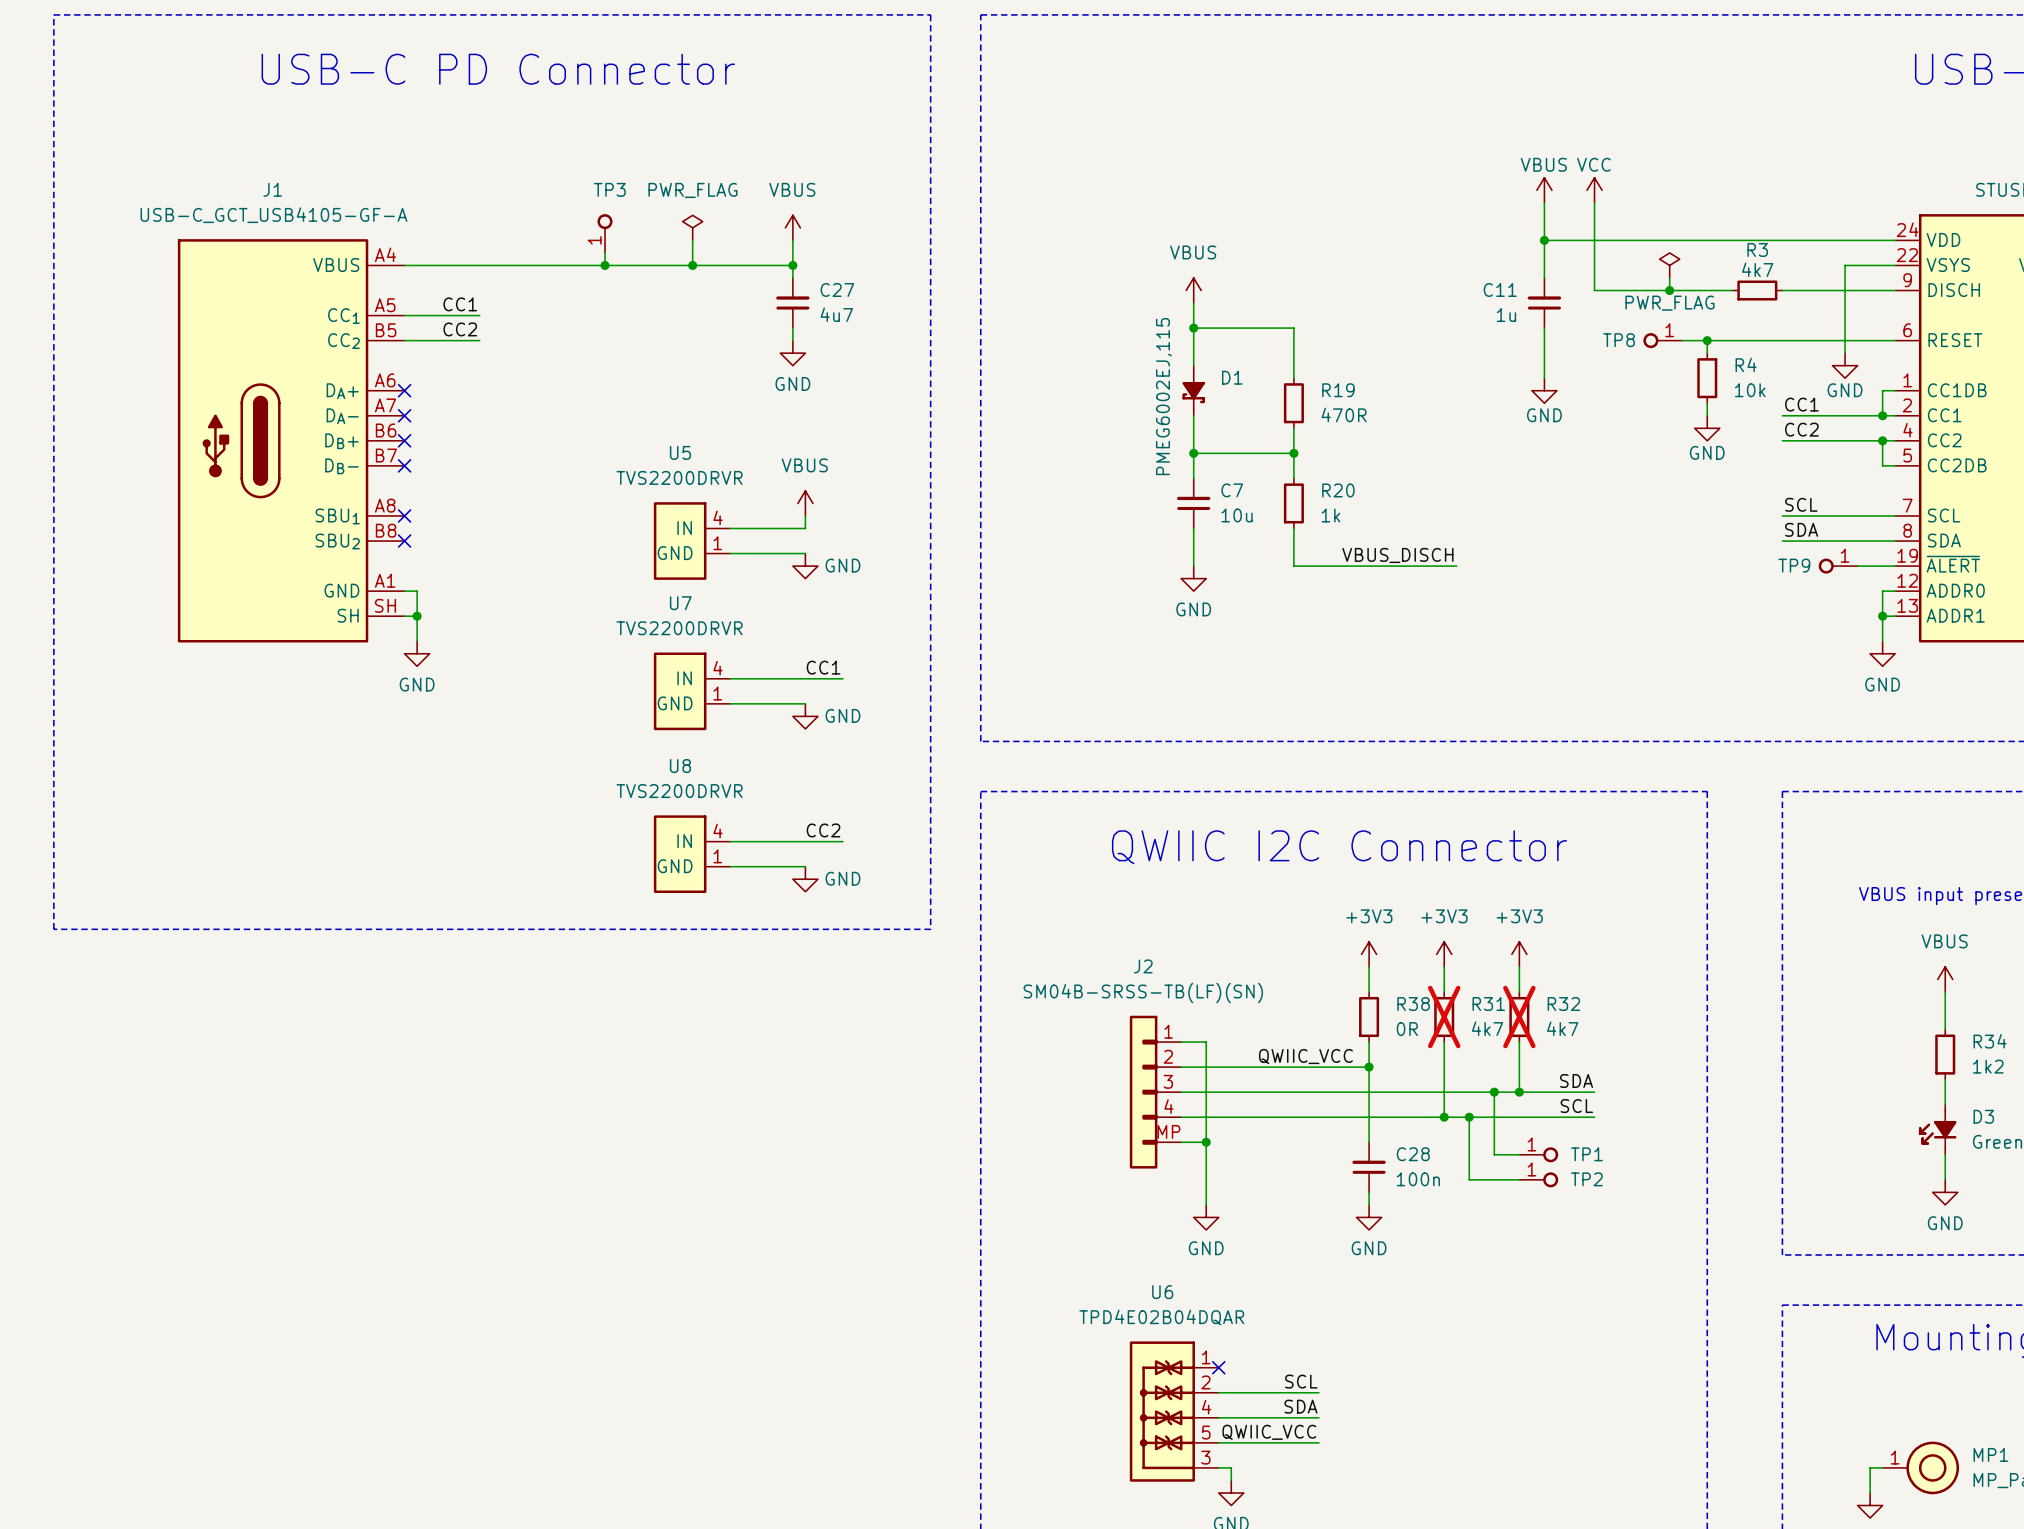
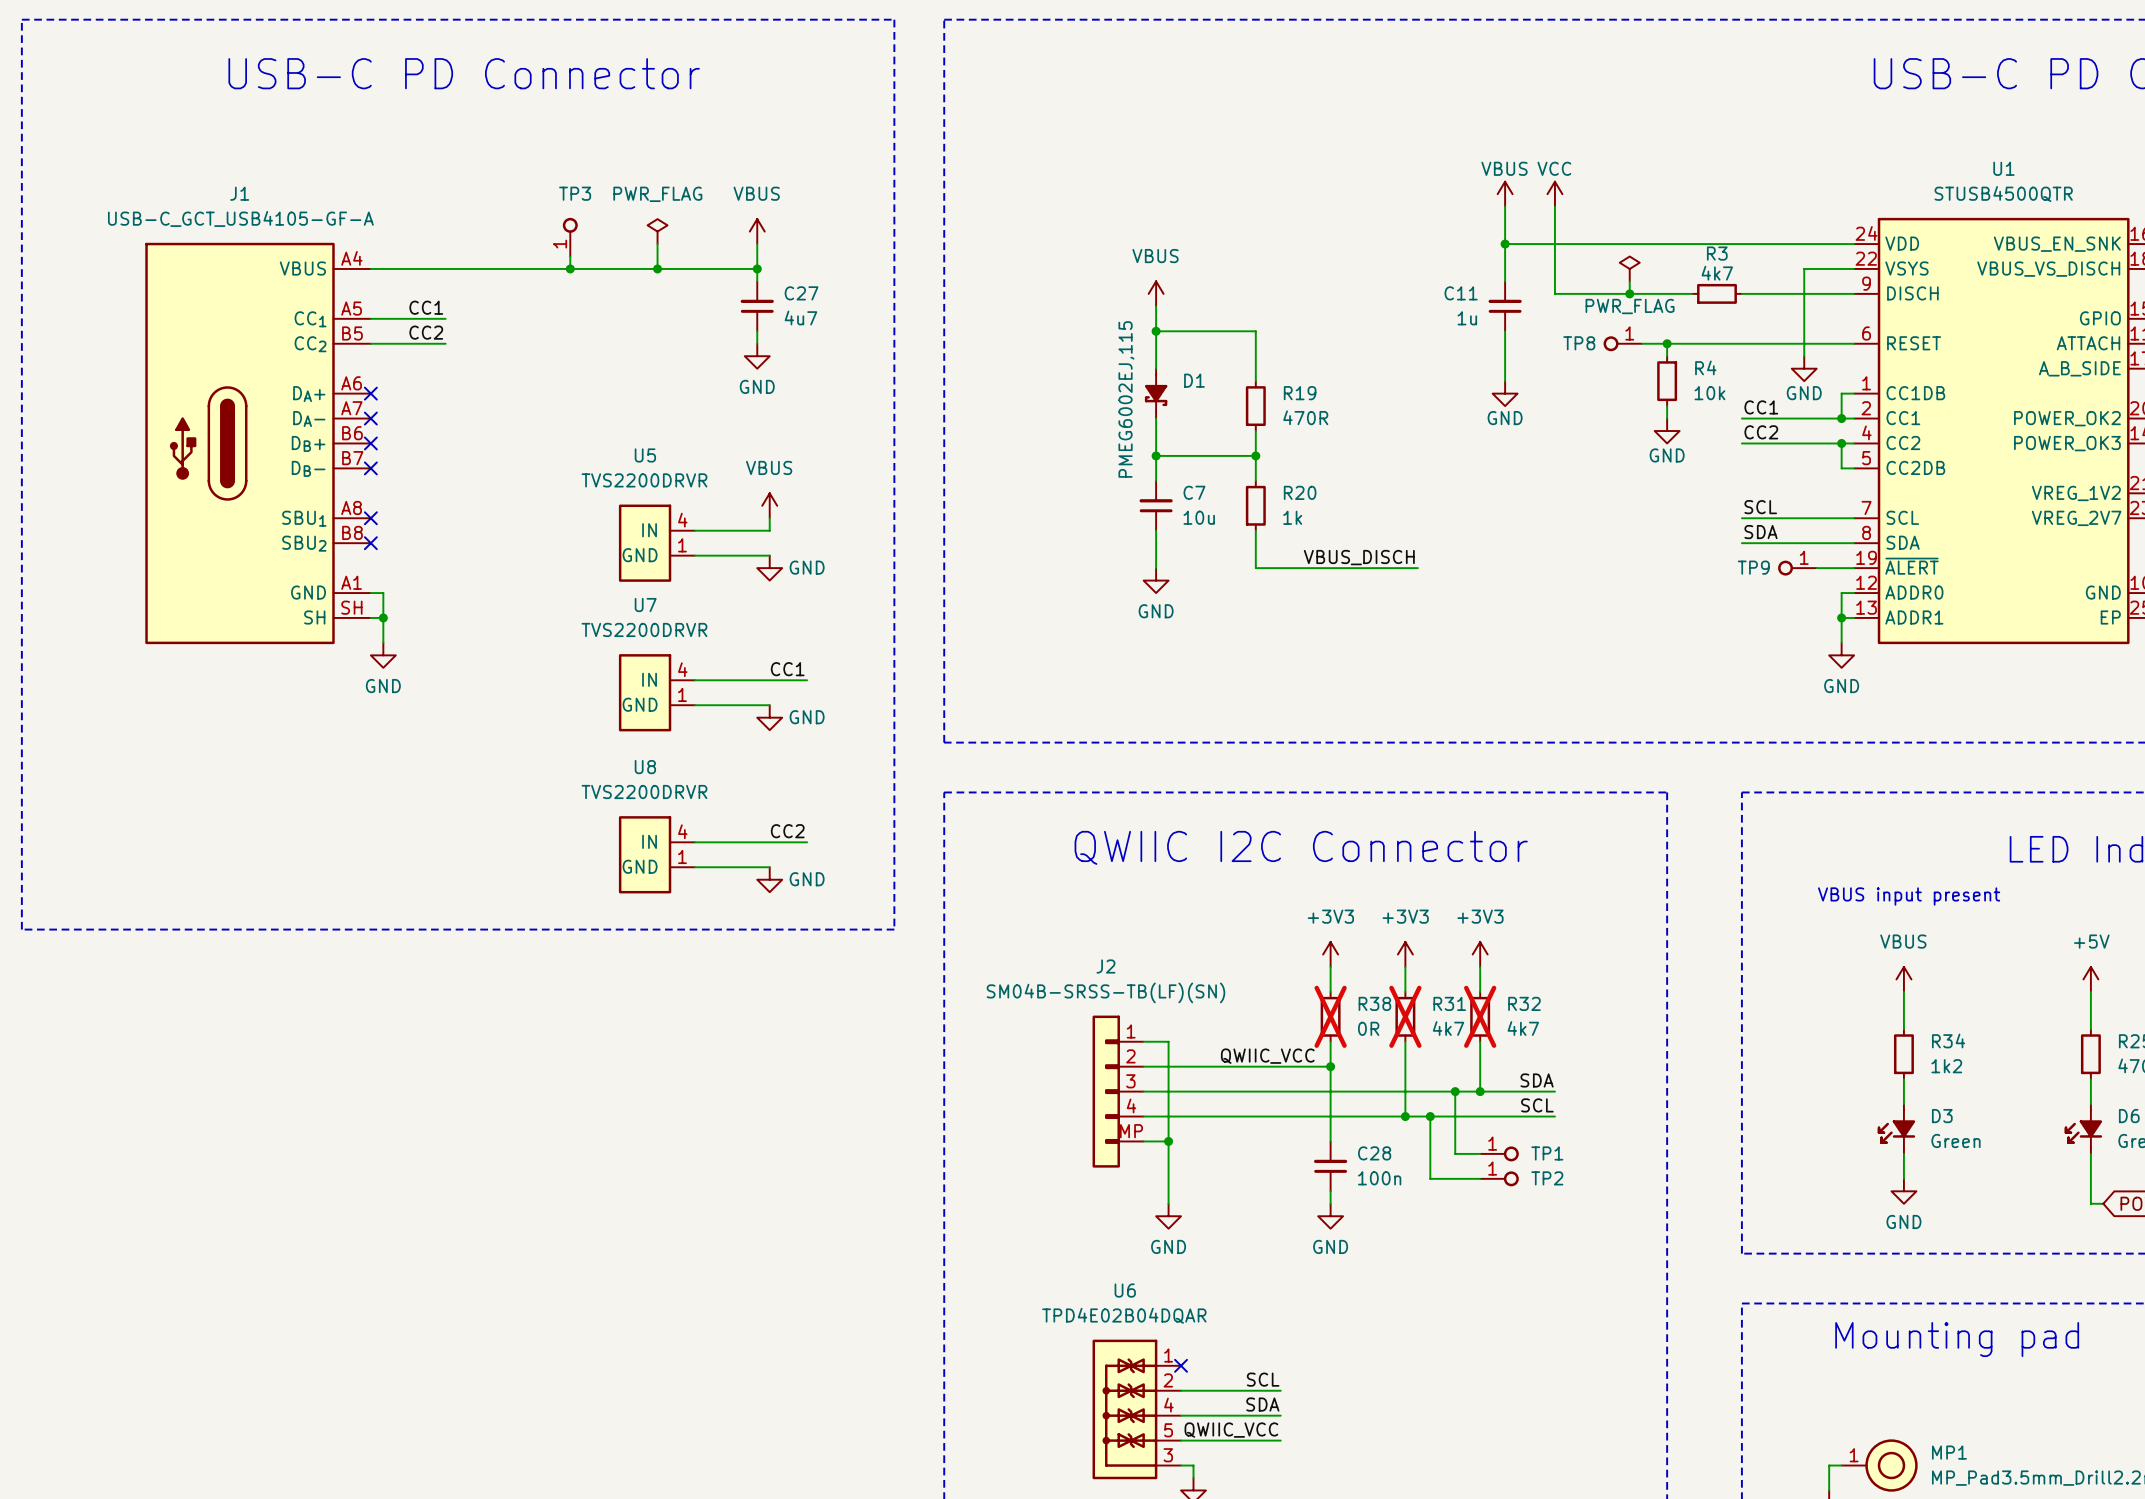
R38 do-not-place cross: none -> (1330, 1016)

